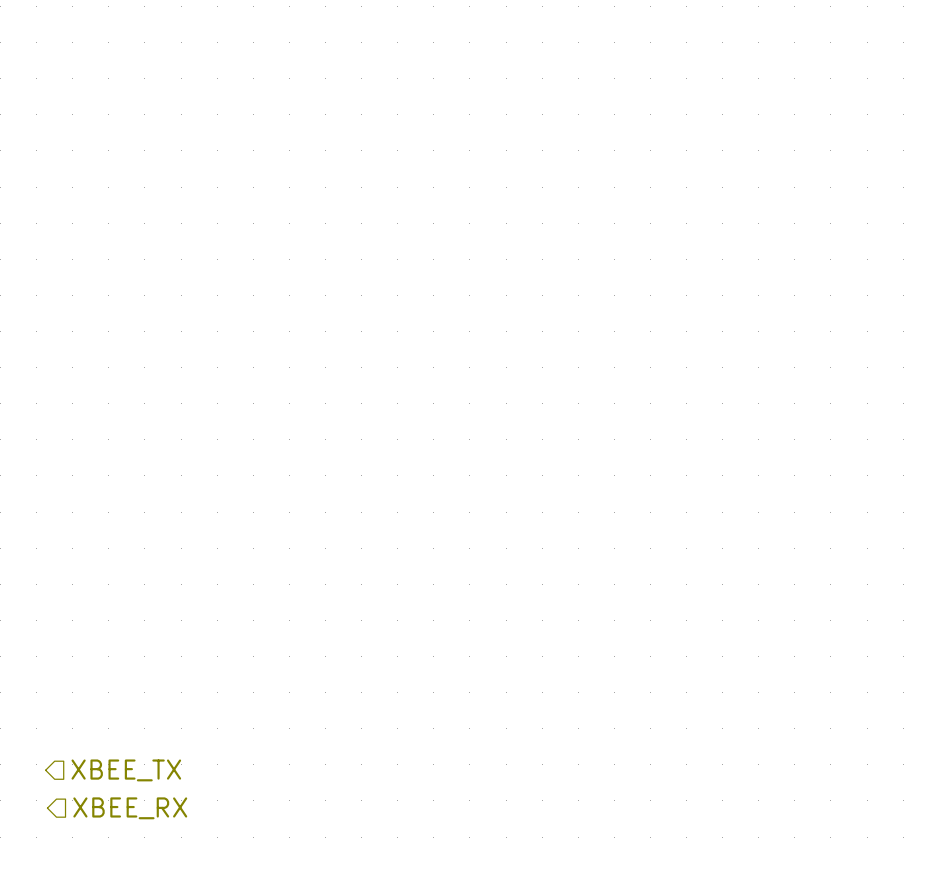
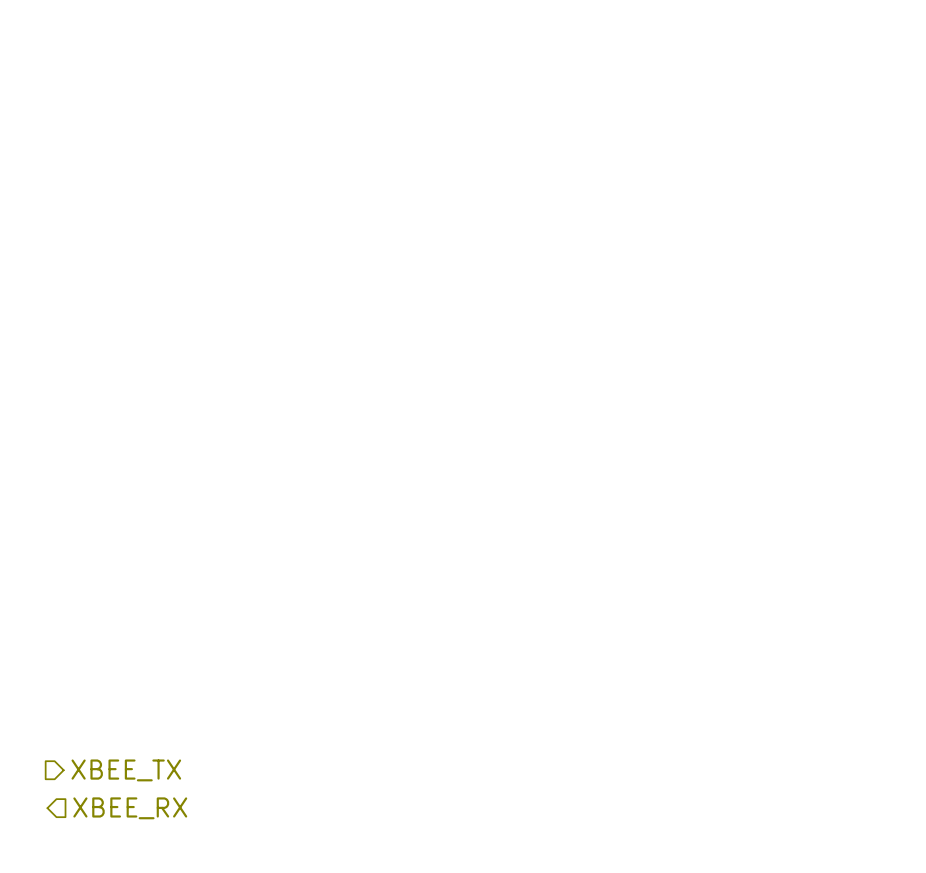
hierarchical label shape: input (126, 770) -> output (126, 770)

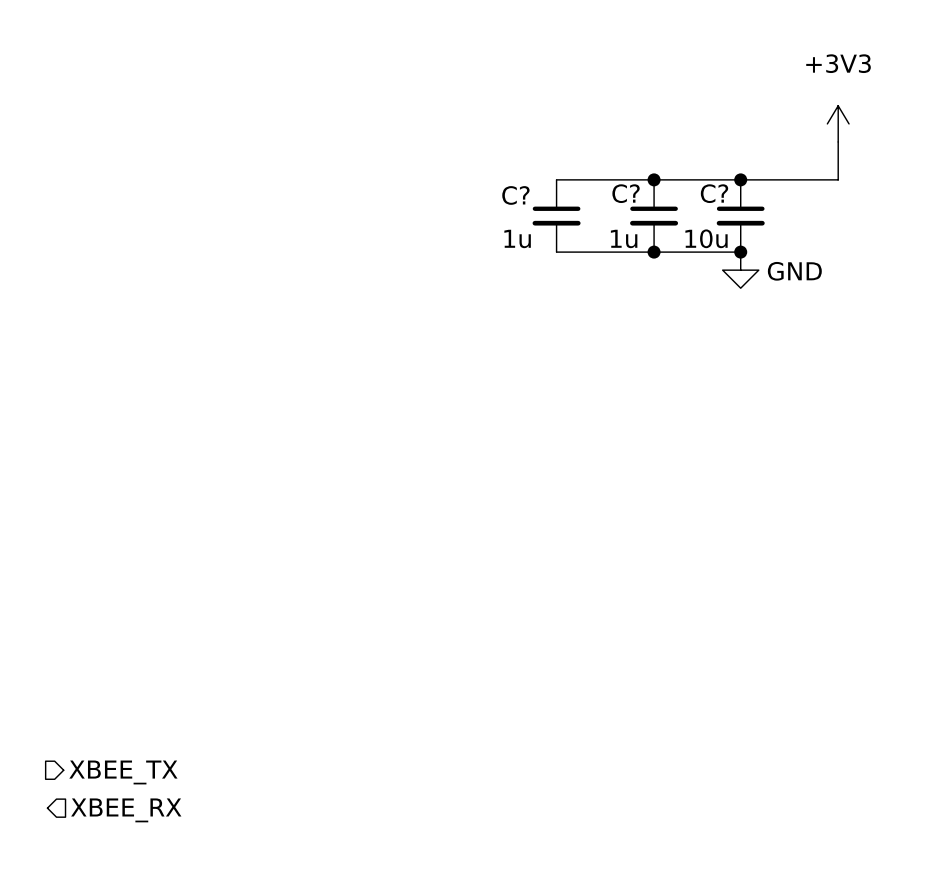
power symbol: none -> +3V3 (838, 123)
wire: none -> (838, 141) (838, 179) (556, 179)
junction: none -> (654, 179)
junction: none -> (740, 179)
C?: none -> 1u (556, 215)
C?: none -> 1u (654, 215)
C?: none -> 10u (740, 215)
wire: none -> (556, 252) (740, 252)
junction: none -> (654, 252)
junction: none -> (740, 252)
power symbol: none -> GND (740, 270)

